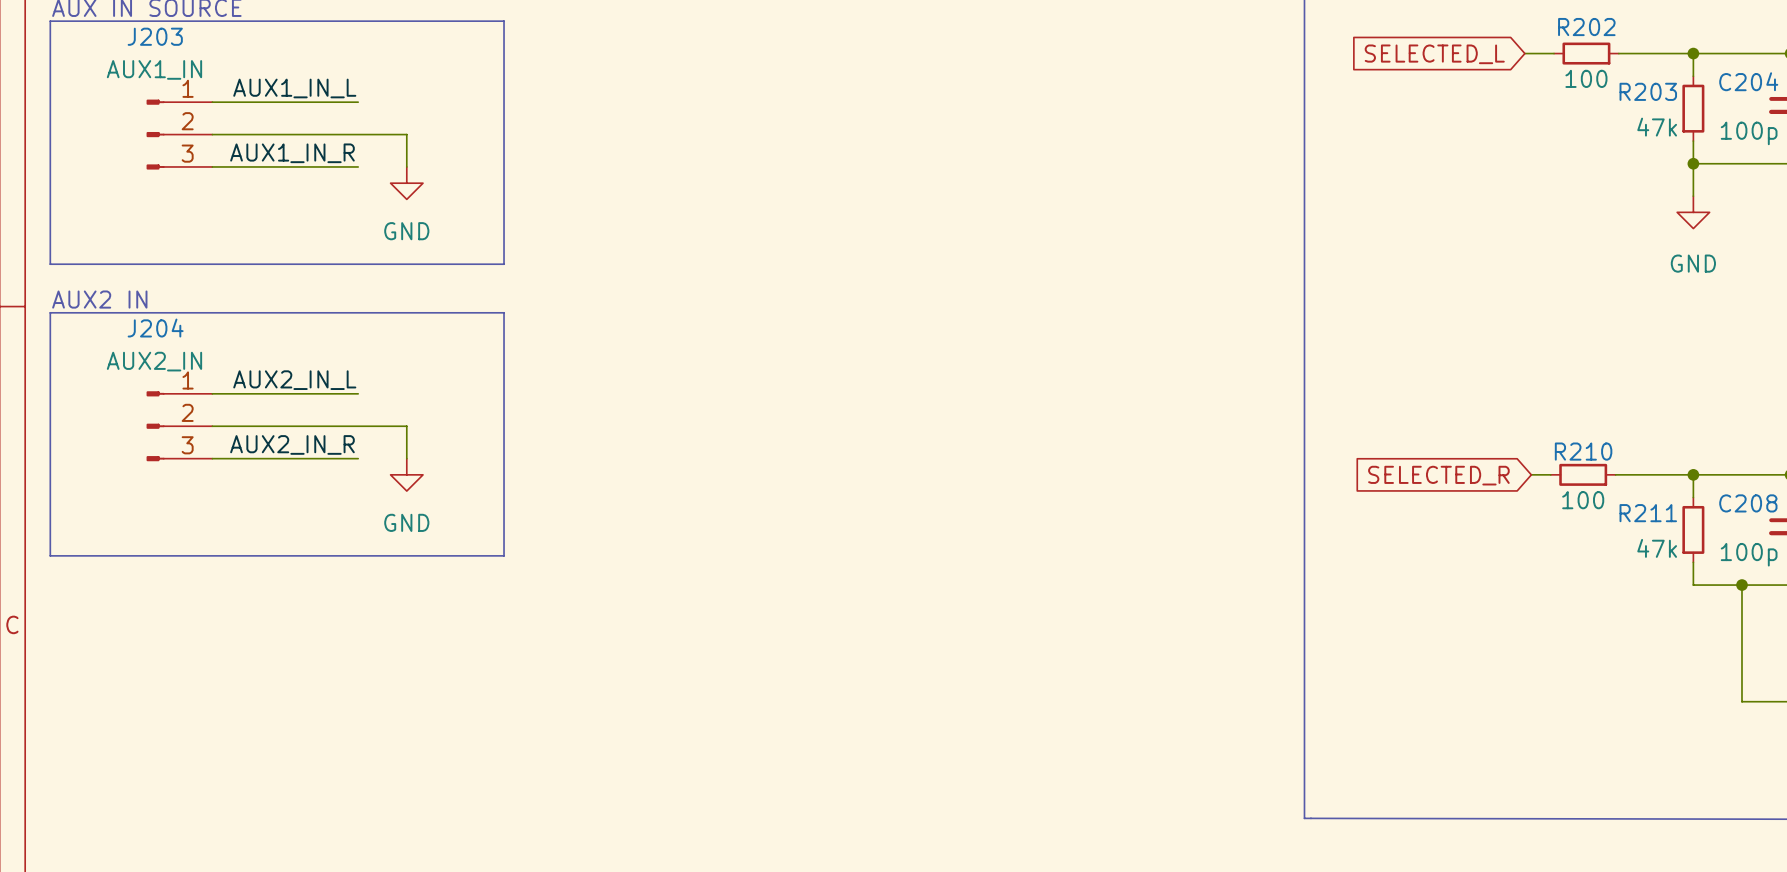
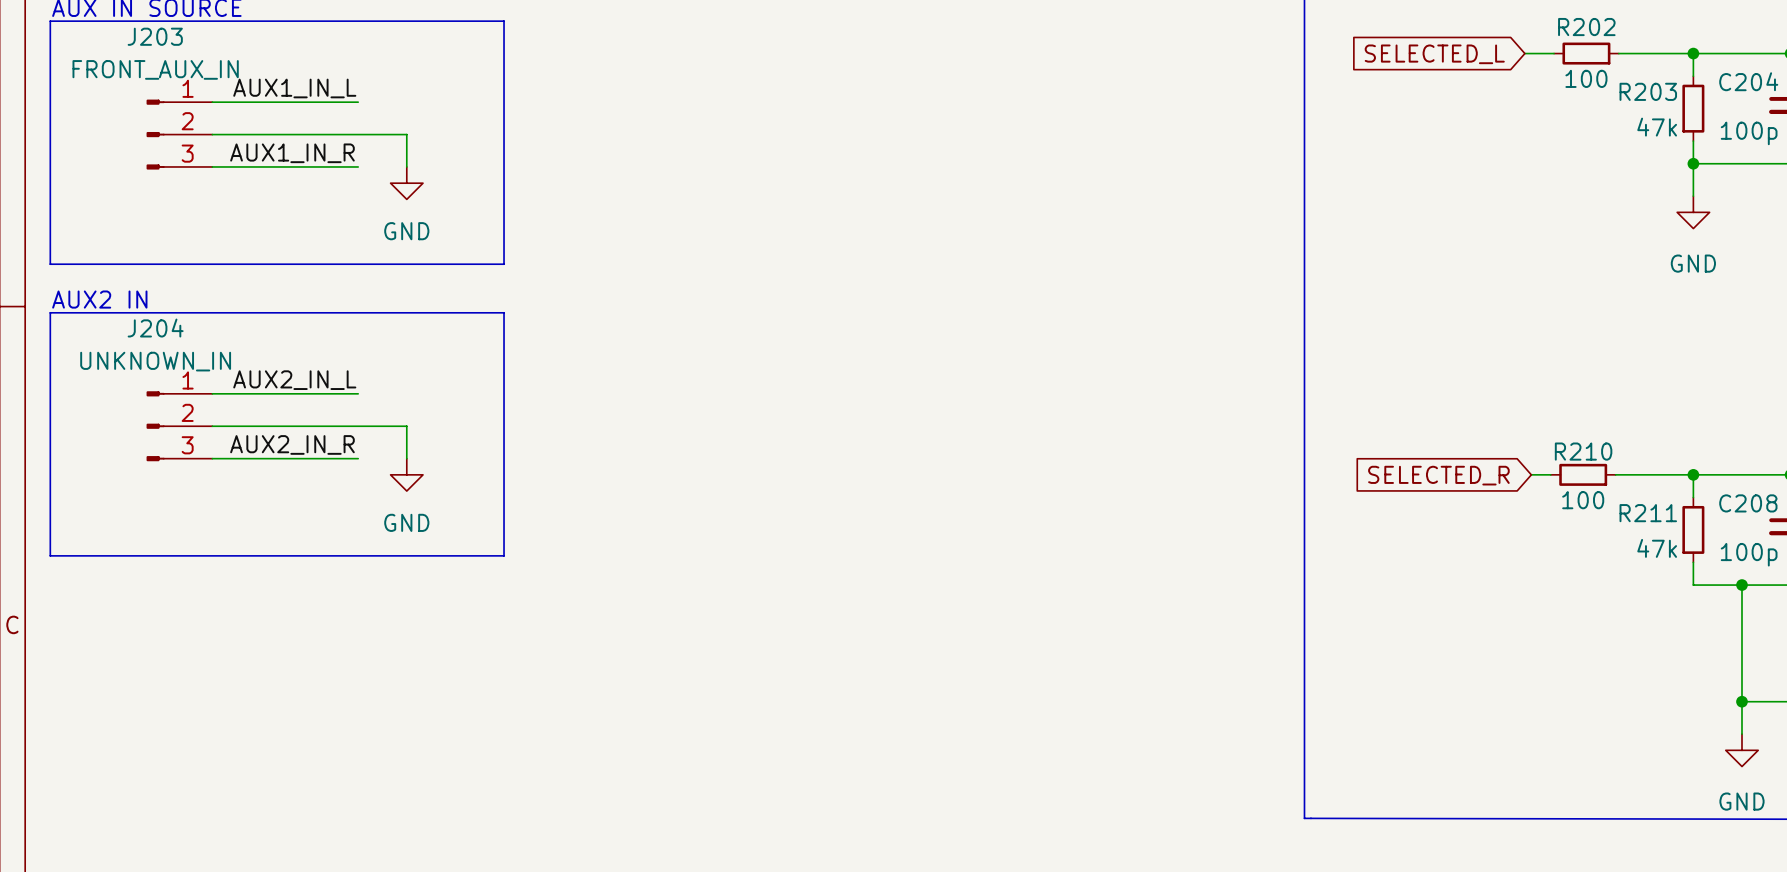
J203 value: AUX1_IN (154, 69) -> FRONT_AUX_IN (155, 69)
J204 value: AUX2_IN (154, 361) -> UNKNOWN_IN (155, 361)
wire: none -> (1741, 701) (1741, 734)
junction: none -> (1741, 701)
power symbol: none -> GND (1741, 750)

